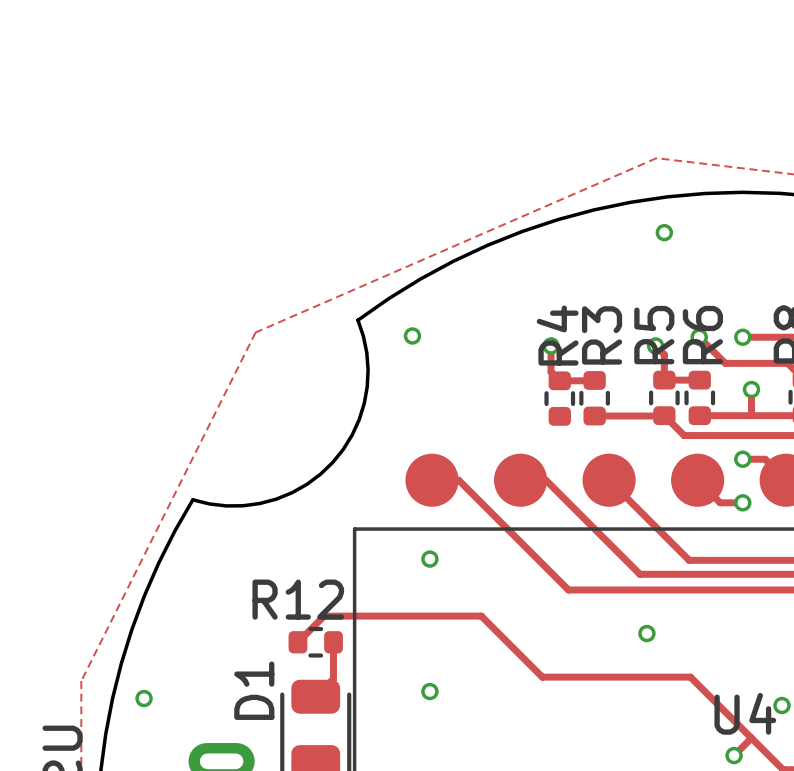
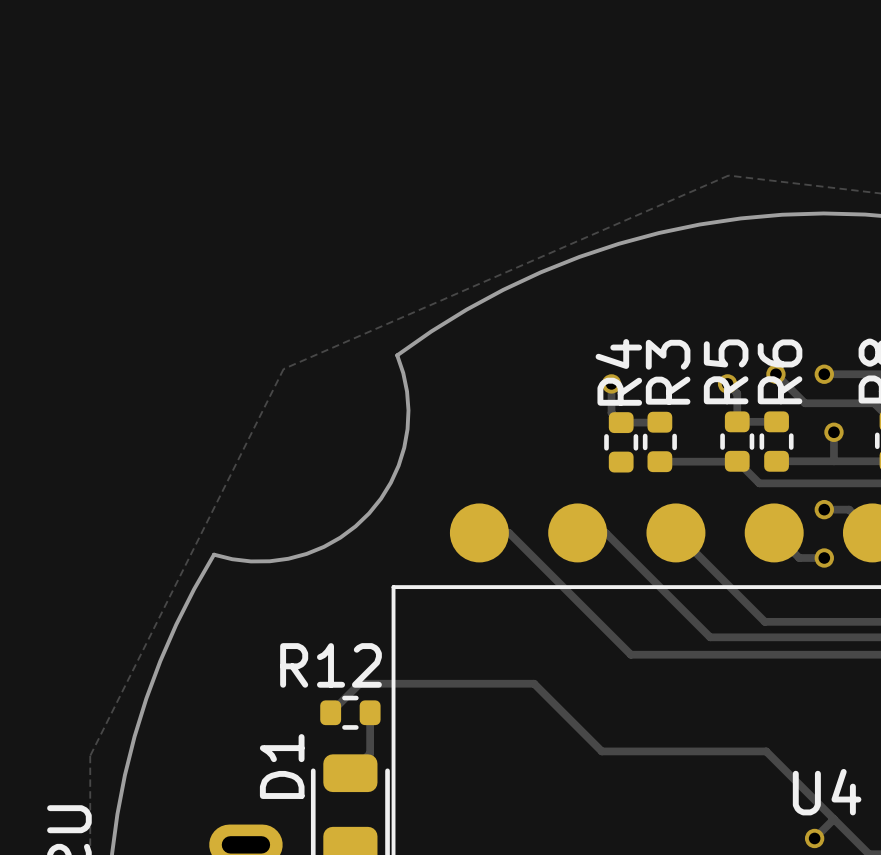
via: (664, 232) -> none
via: (412, 335) -> none
via: (429, 559) -> none
via: (646, 633) -> none
via: (429, 691) -> none
via: (144, 698) -> none
via: (782, 705) -> none

